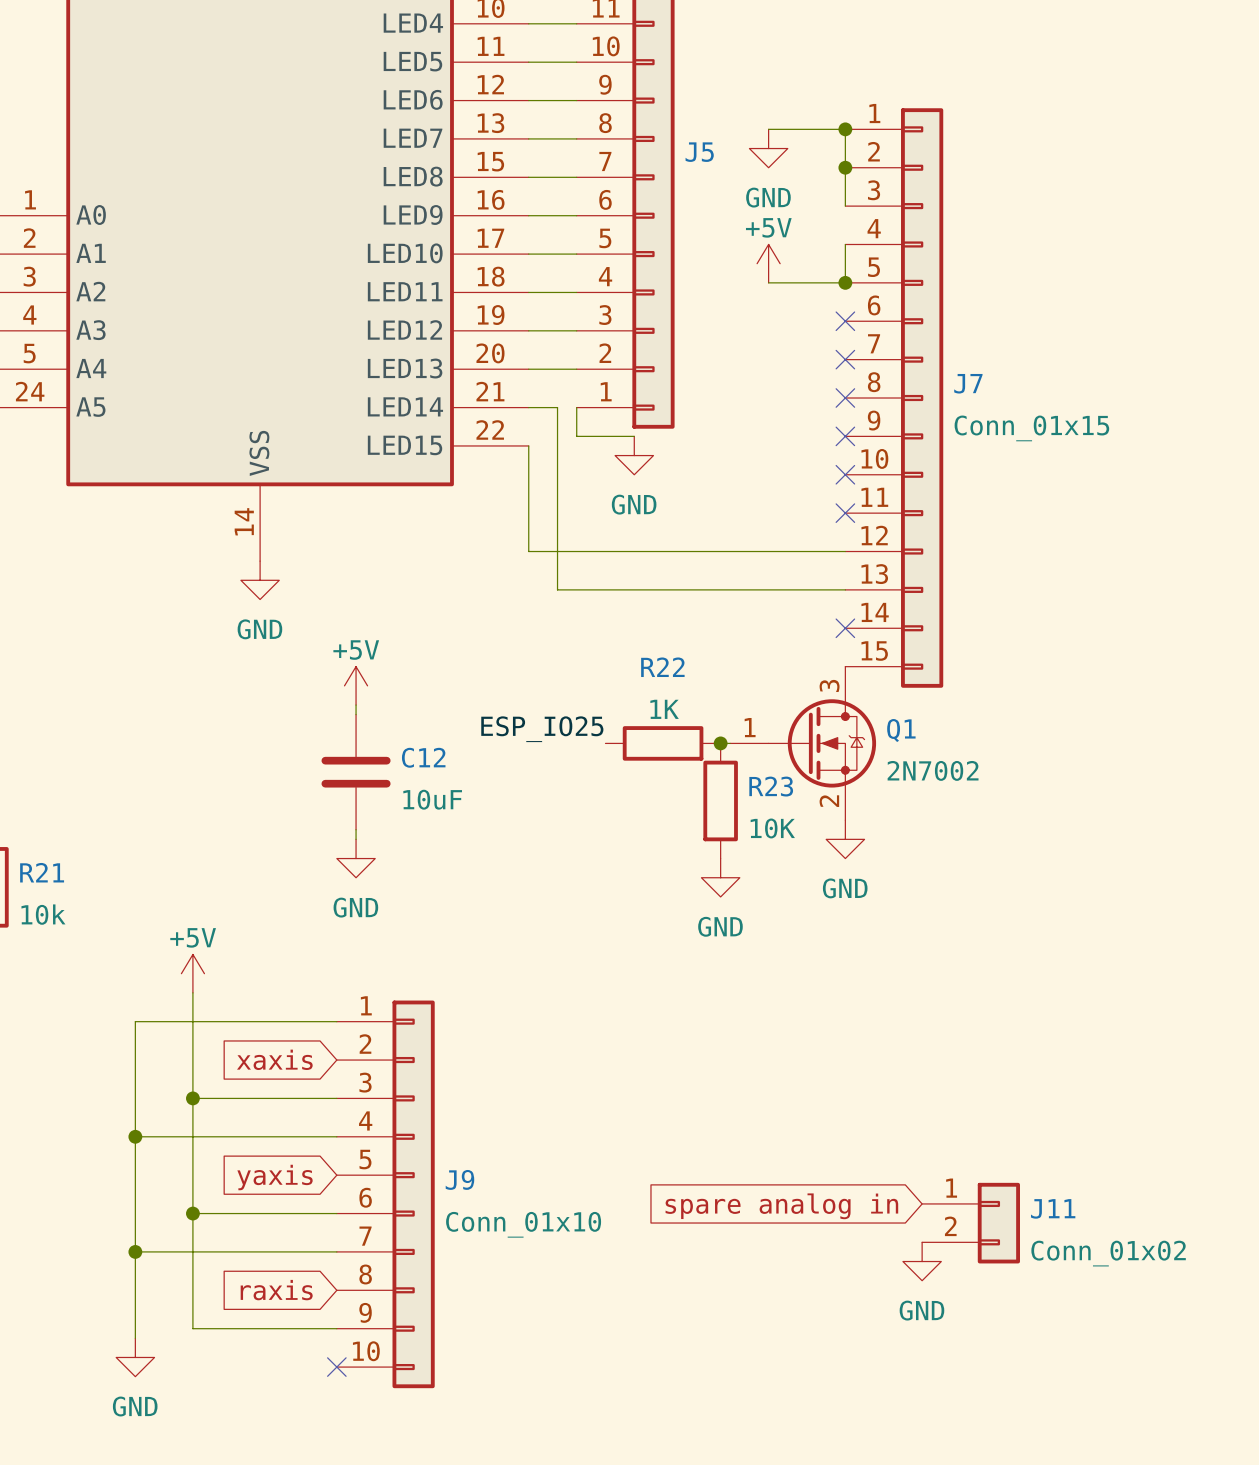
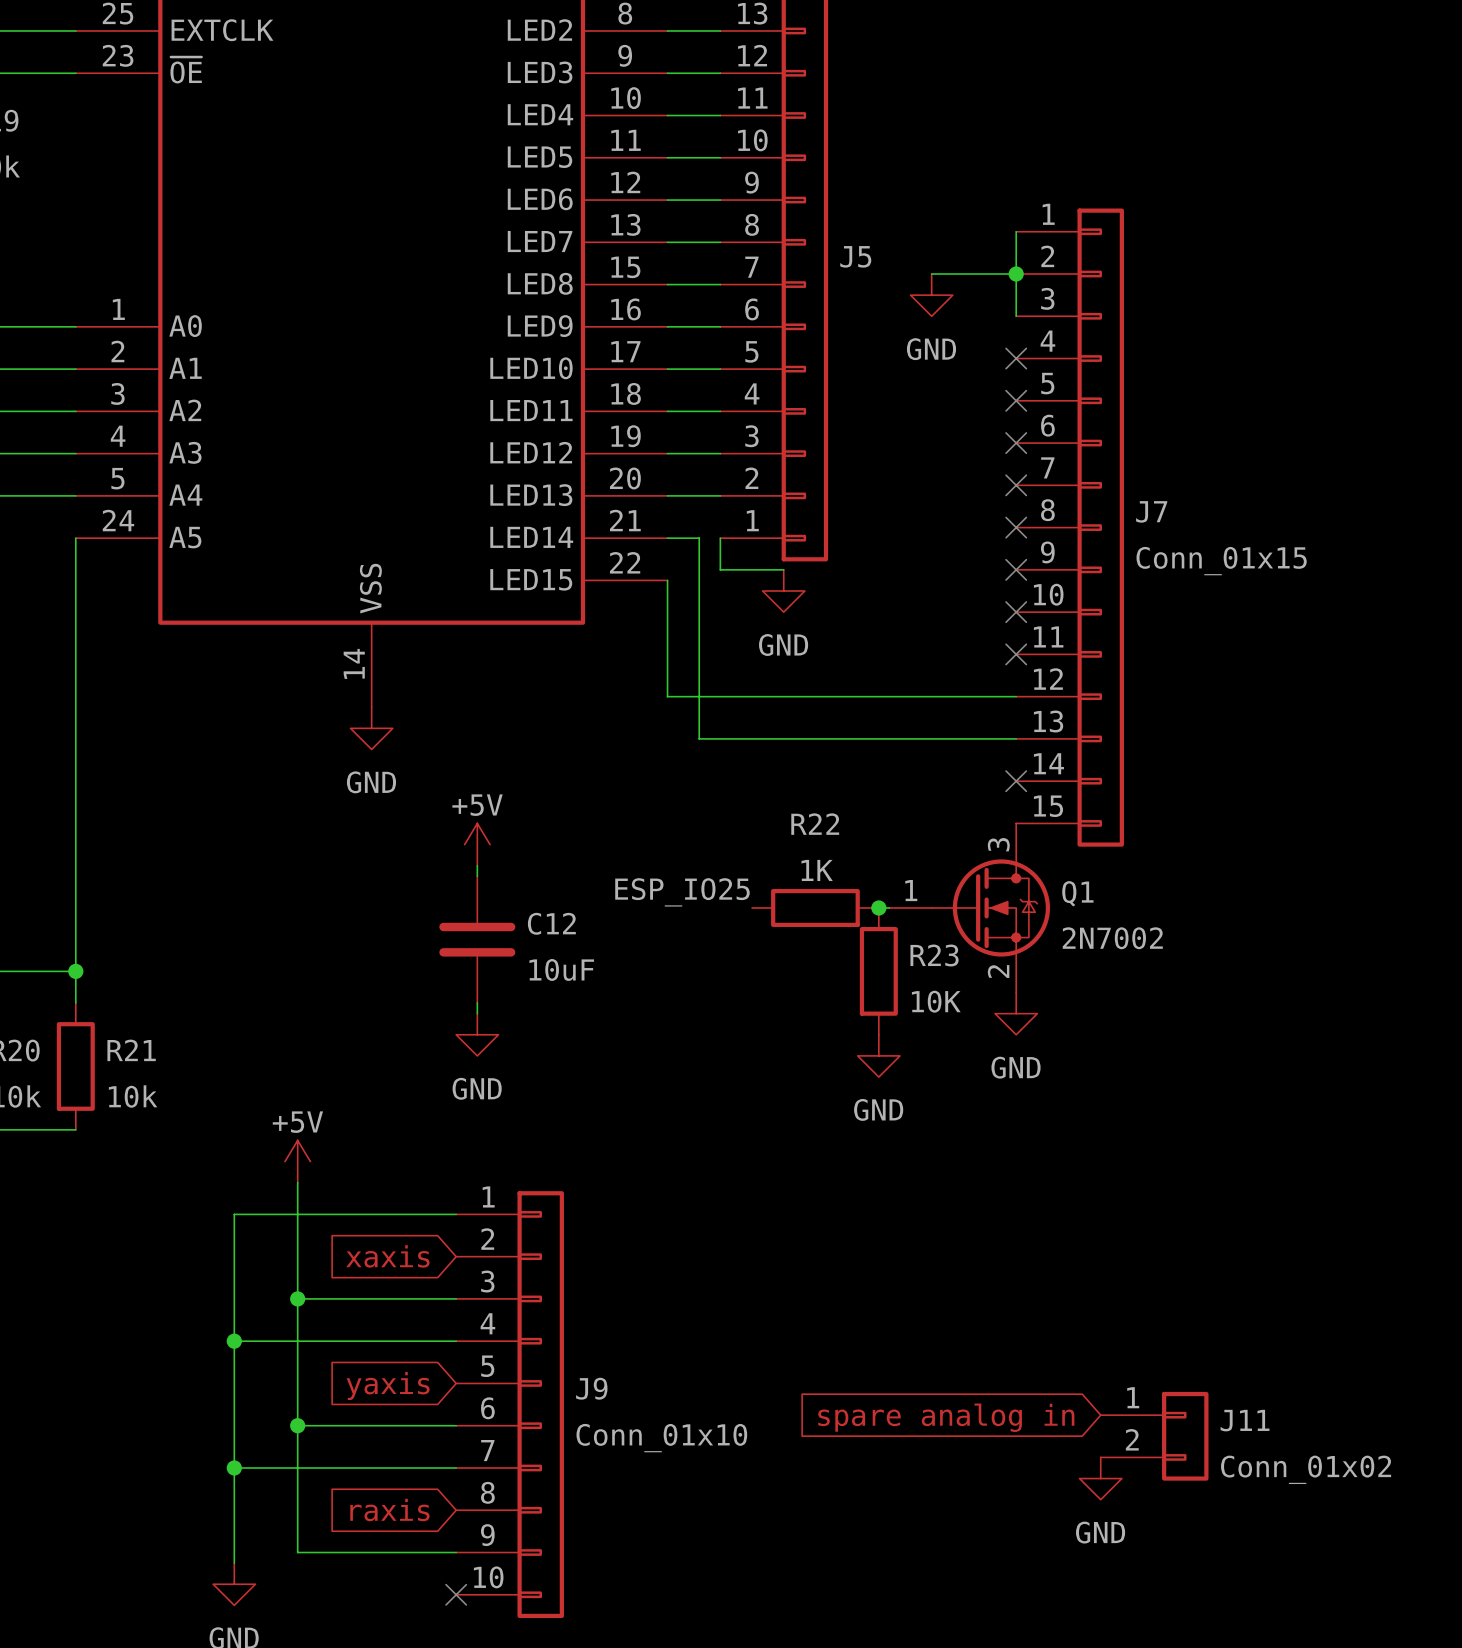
wire: (768, 129) (845, 129) -> (931, 274) (1016, 274)
junction: (845, 129) -> none
power symbol position: GND (768, 148) -> GND (931, 295)
wire: (845, 244) (845, 282) (768, 282) -> none
no-connect mark: none -> (1016, 358)
power symbol: +5V (768, 263) -> none
junction: (845, 282) -> none
no-connect mark: none -> (1016, 400)

